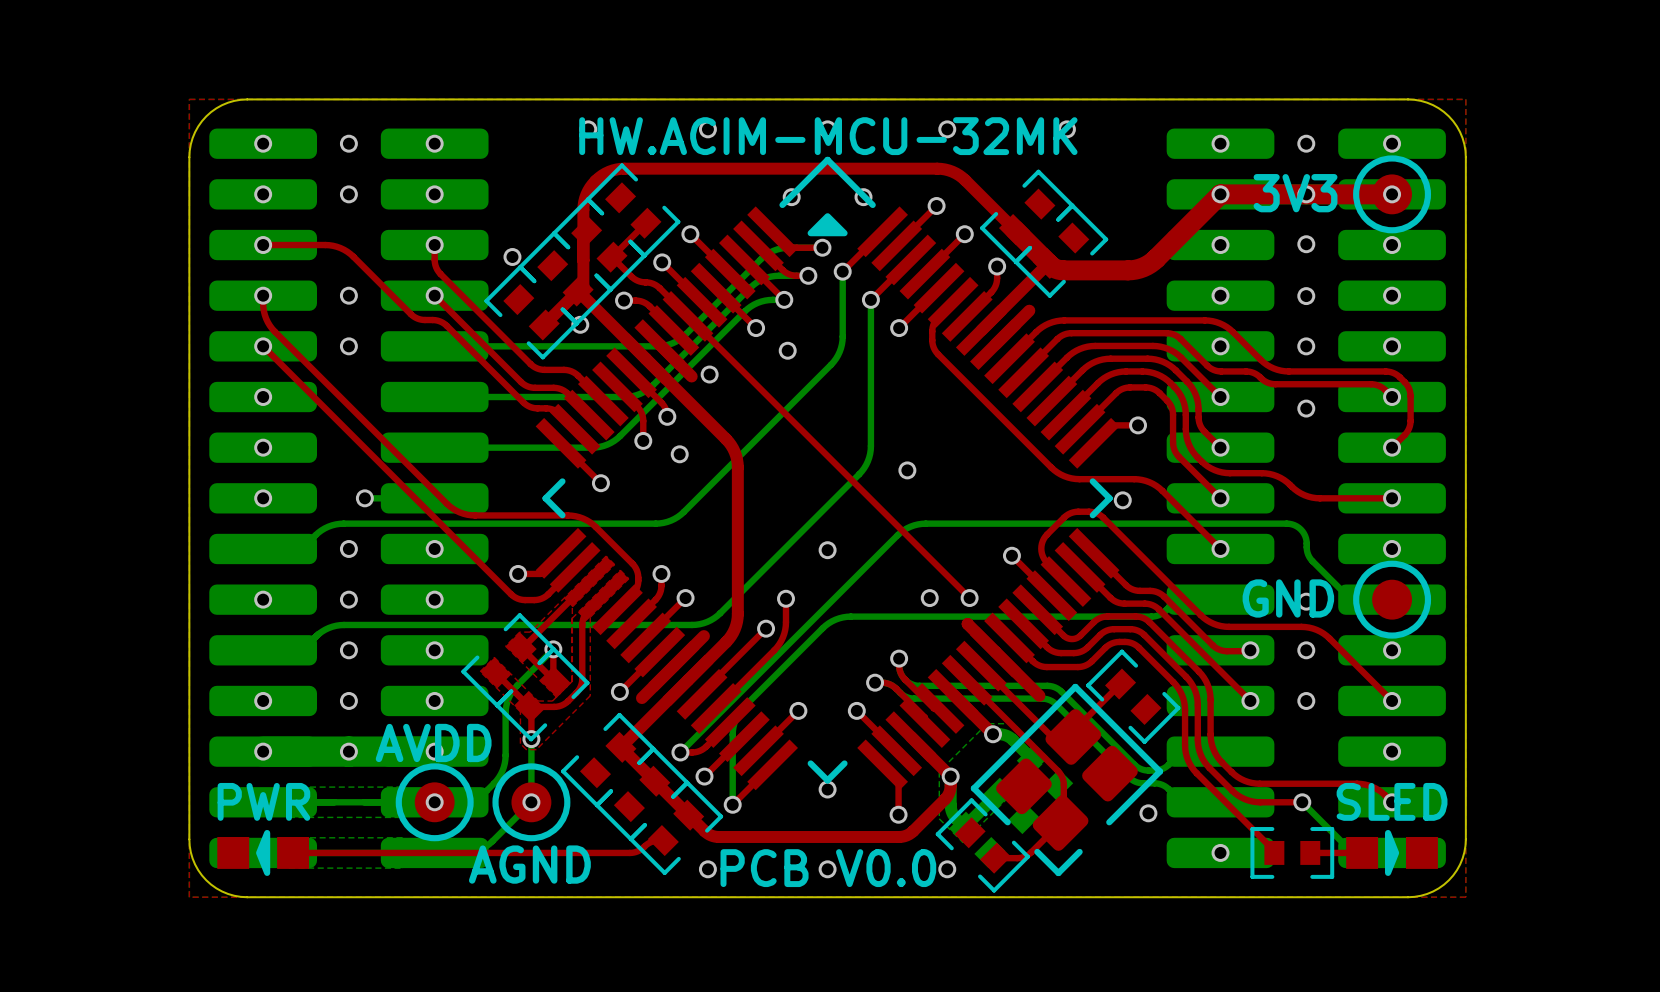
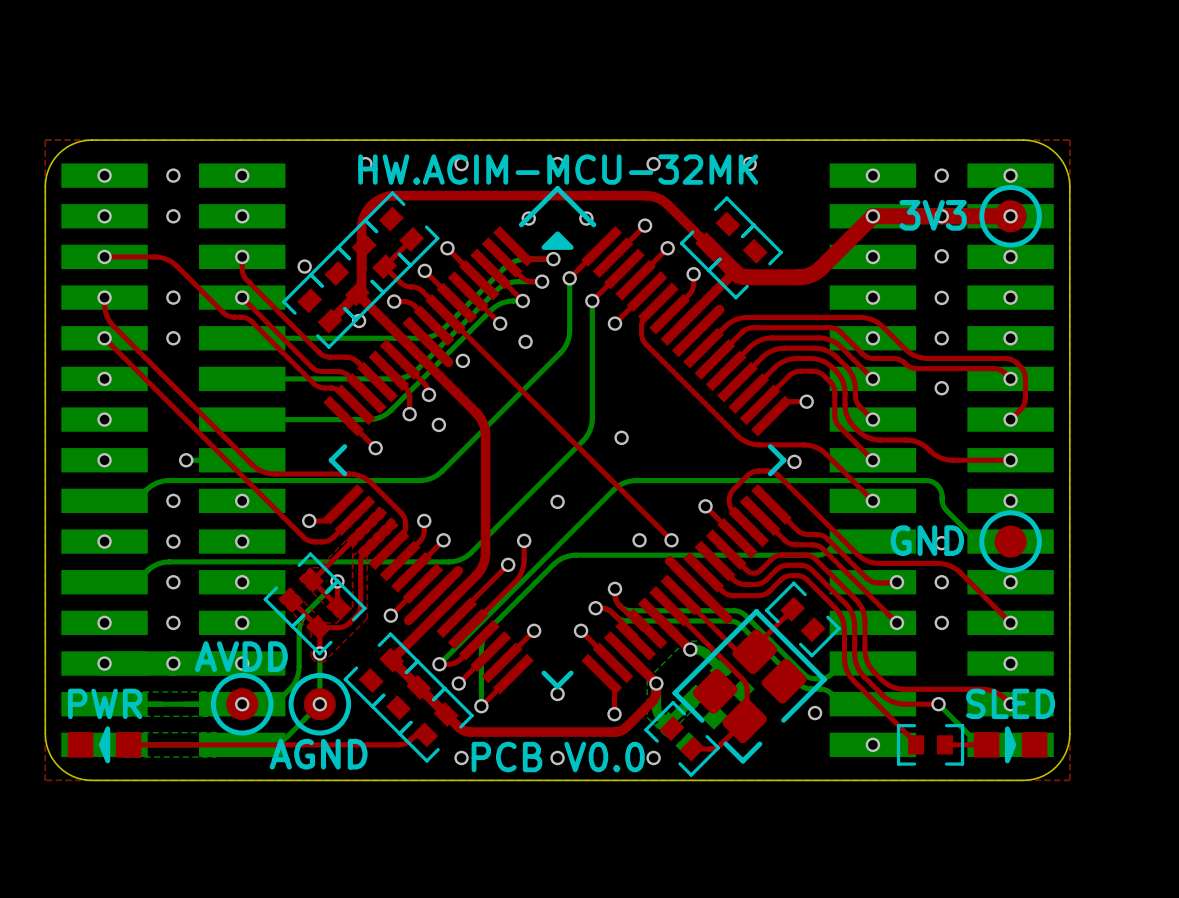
part footprint: [209, 128, 489, 869] -> [61, 163, 286, 758]
part footprint: [1166, 128, 1446, 869] -> [829, 163, 1054, 758]

